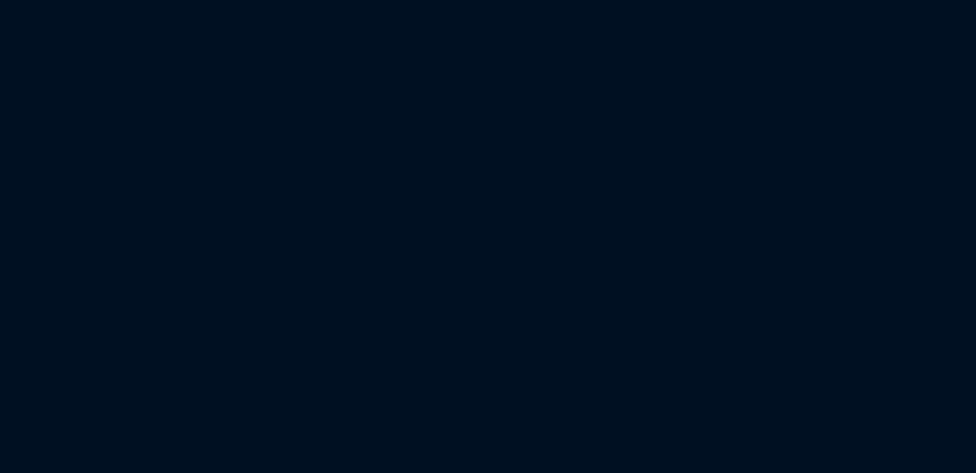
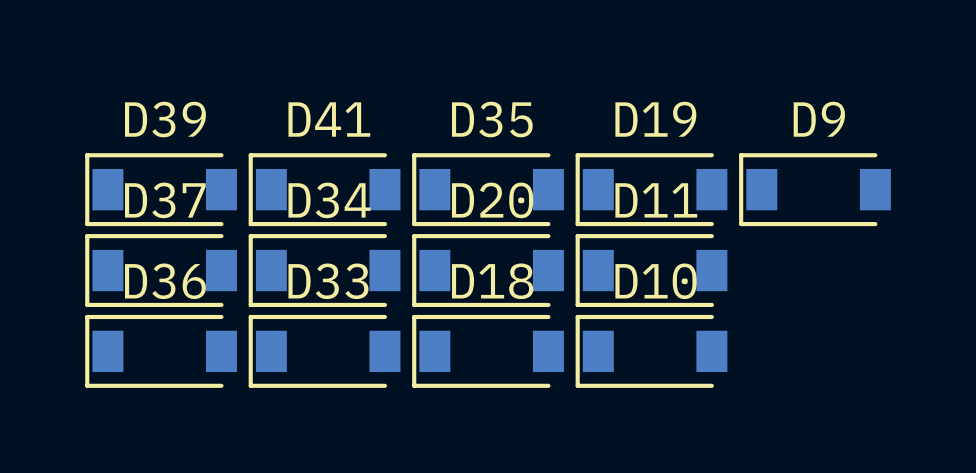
D39: none -> (161, 189)
D41: none -> (324, 189)
D35: none -> (488, 189)
D19: none -> (651, 189)
D9: none -> (814, 189)
D37: none -> (161, 270)
D34: none -> (324, 270)
D20: none -> (488, 270)
D11: none -> (651, 270)
D36: none -> (161, 351)
D33: none -> (324, 351)
D18: none -> (488, 351)
D10: none -> (651, 351)

